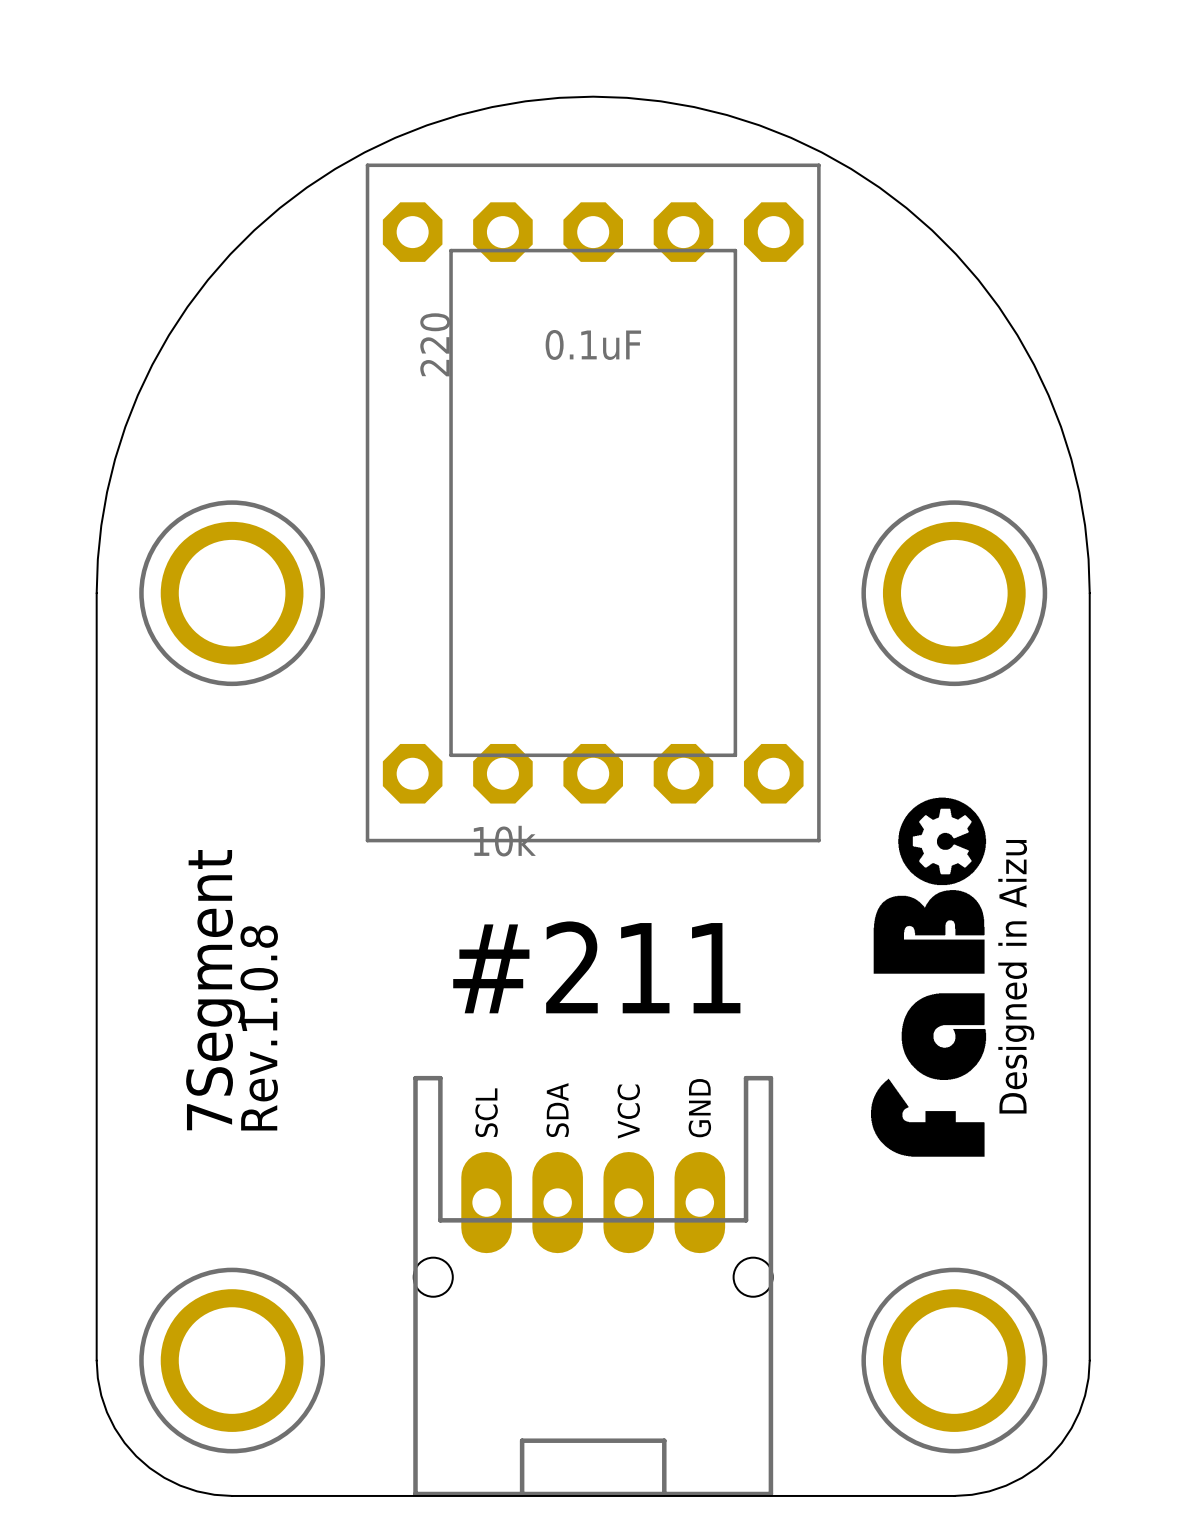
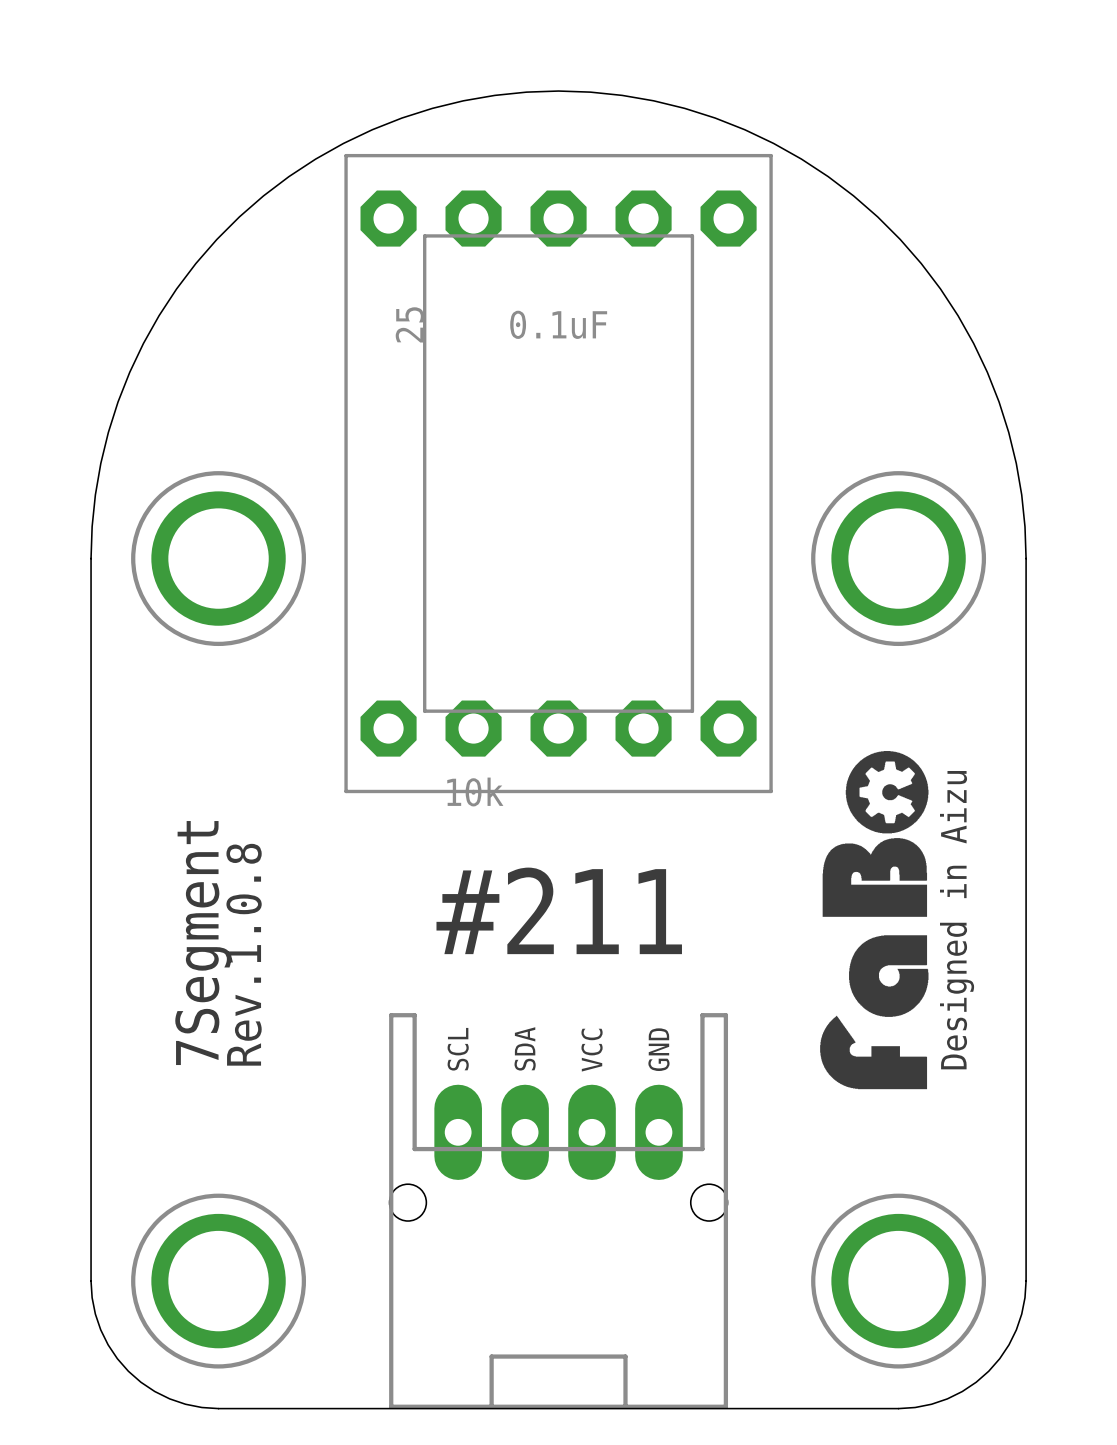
part value: 220 (435, 344) -> 25 (409, 324)

